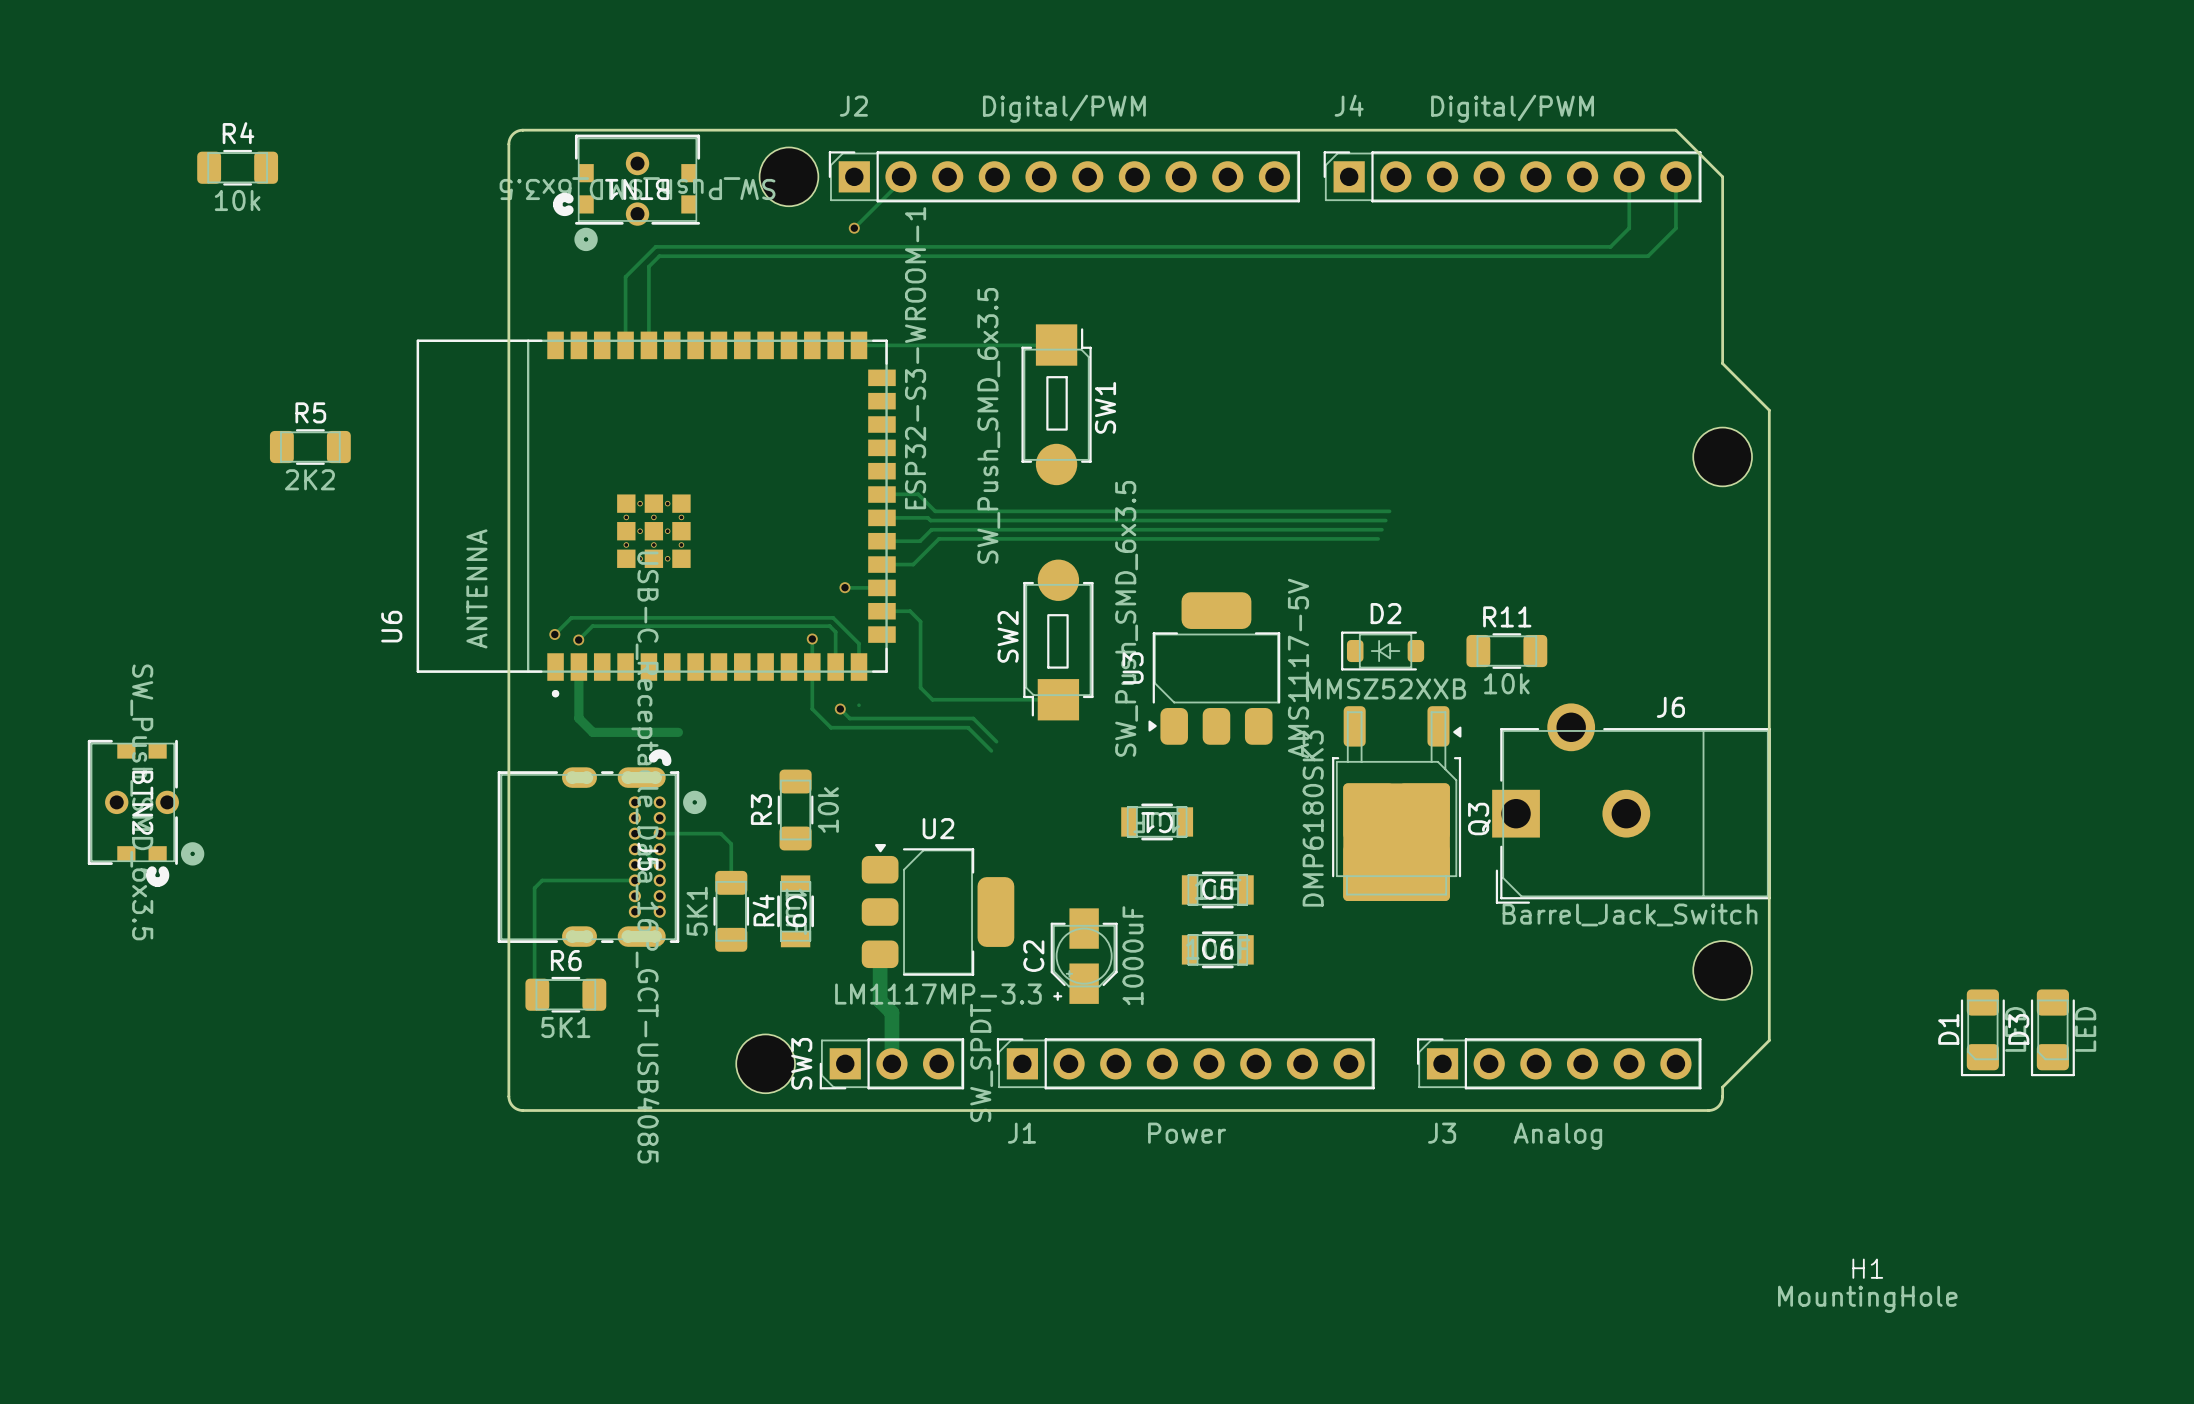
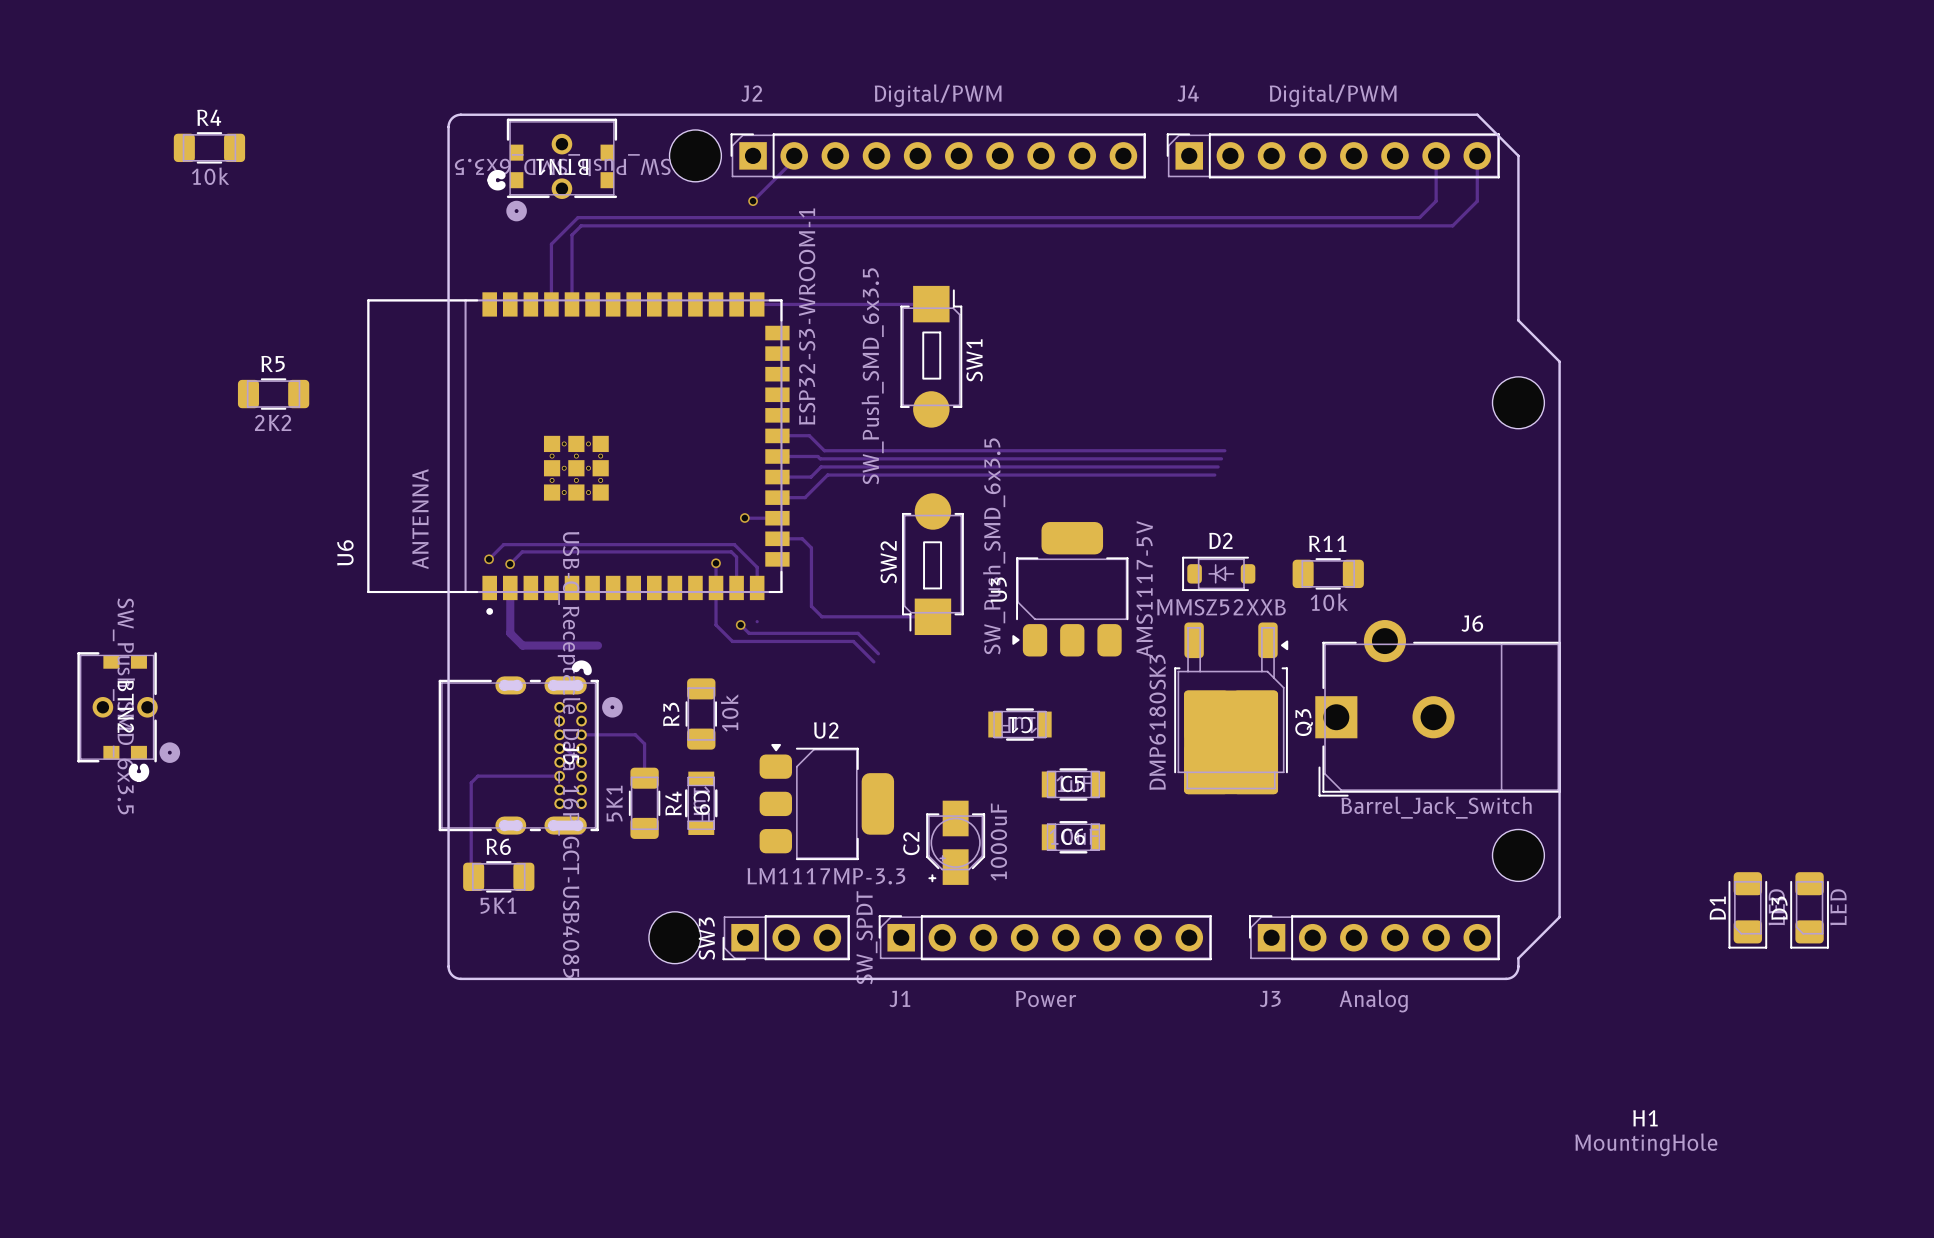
track: (880, 954) (880, 1000) (891, 1012) (891, 1063) -> none

